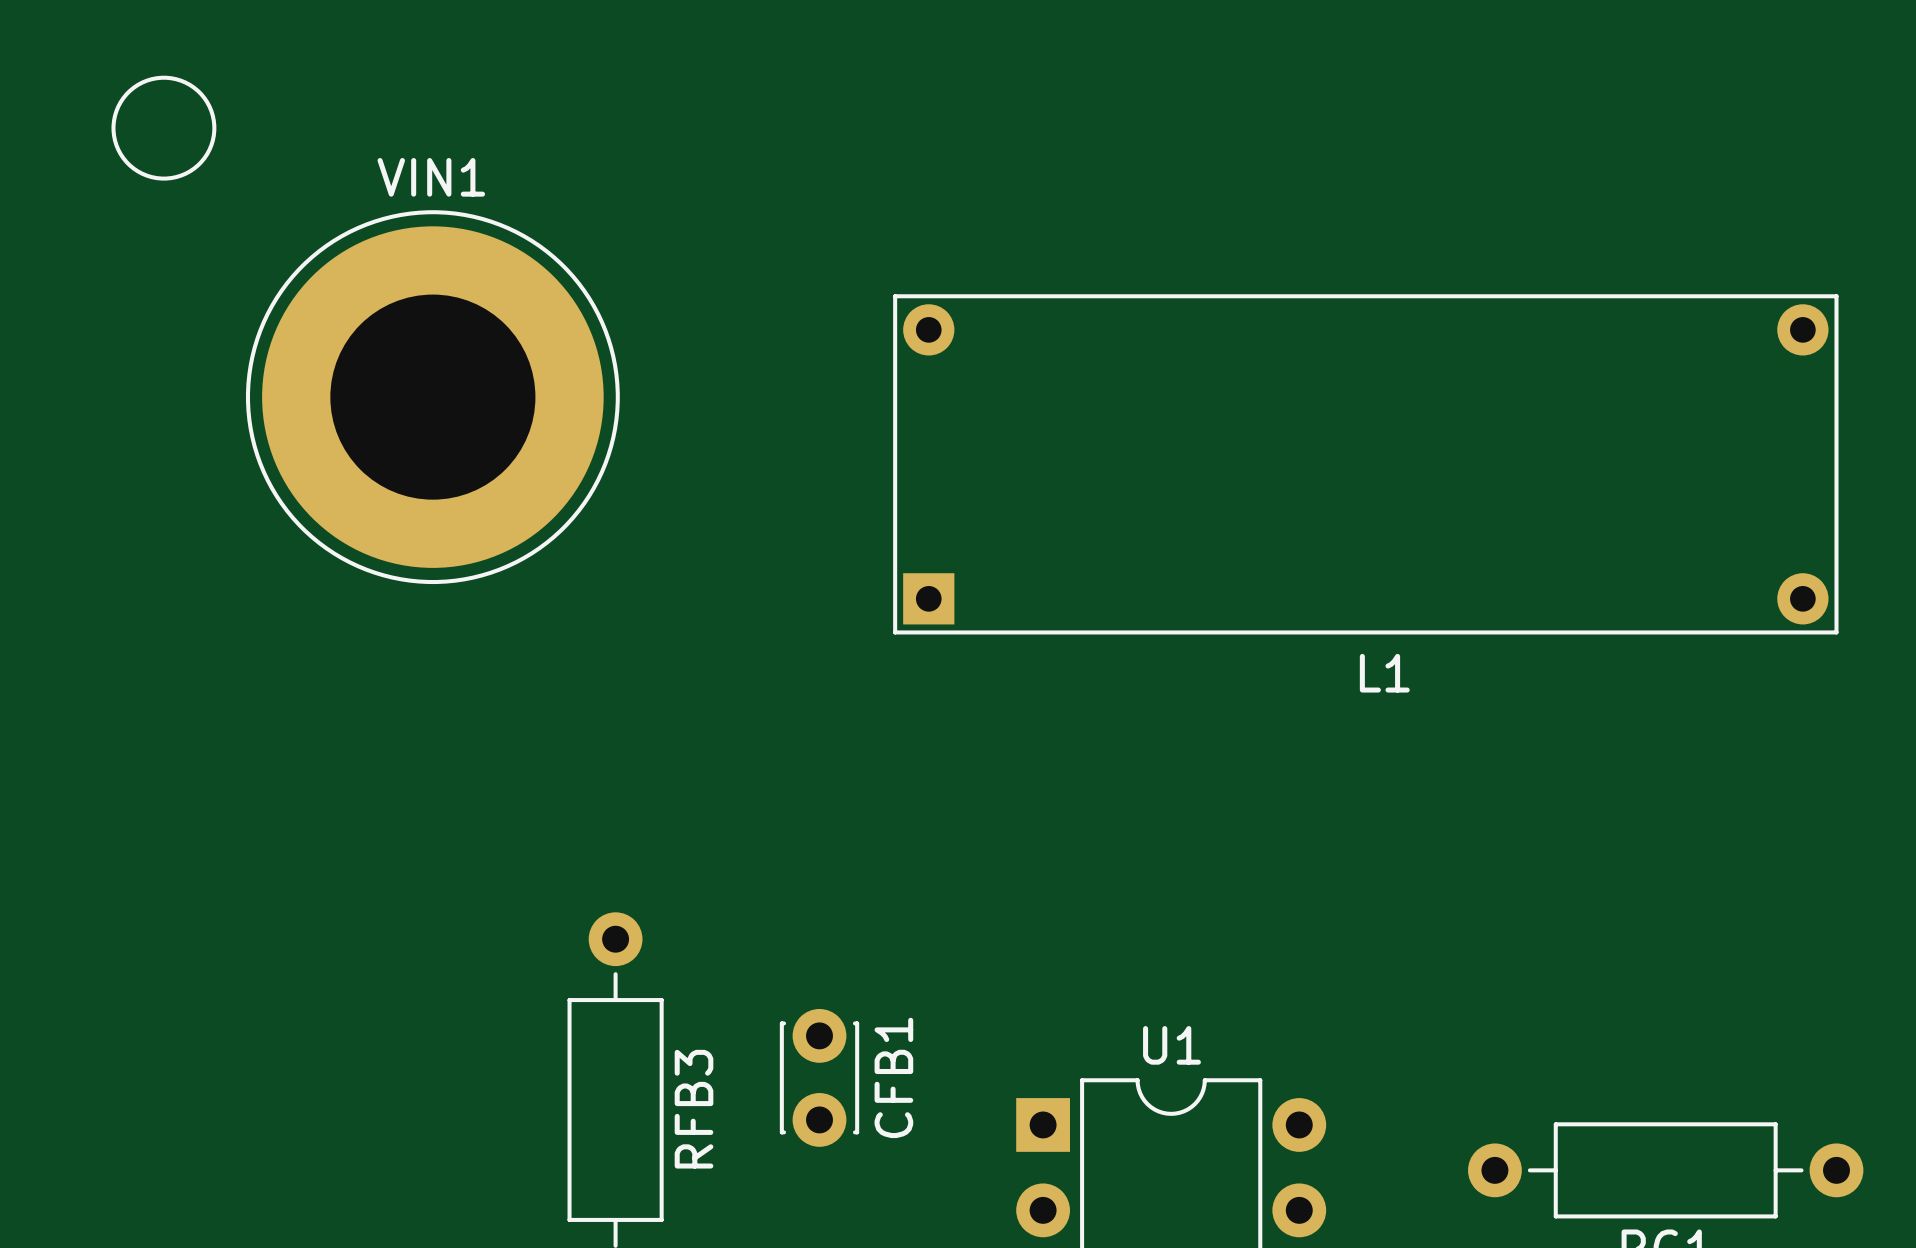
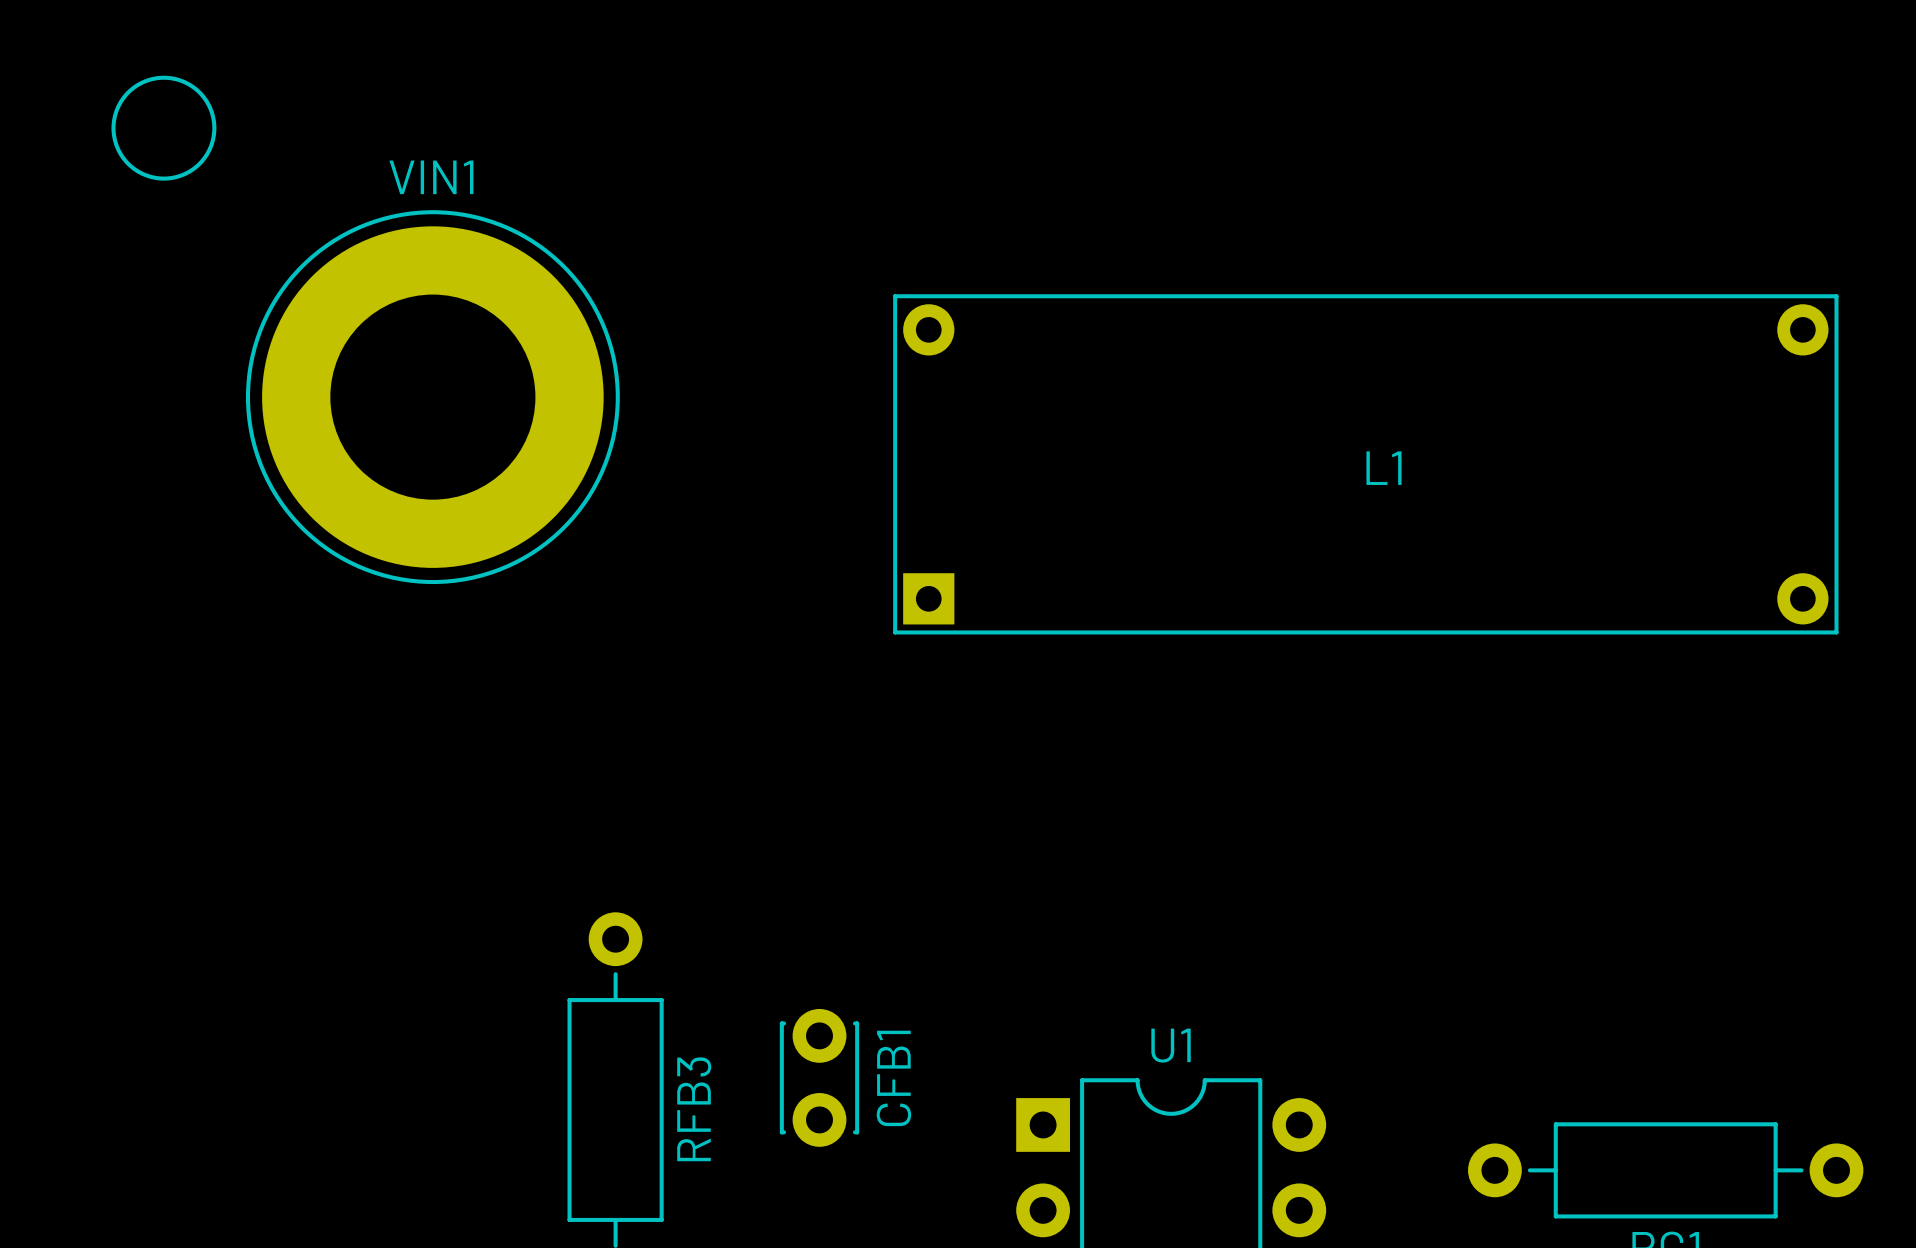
L1 name position: L1 (1384, 673) -> L1 (1384, 468)

